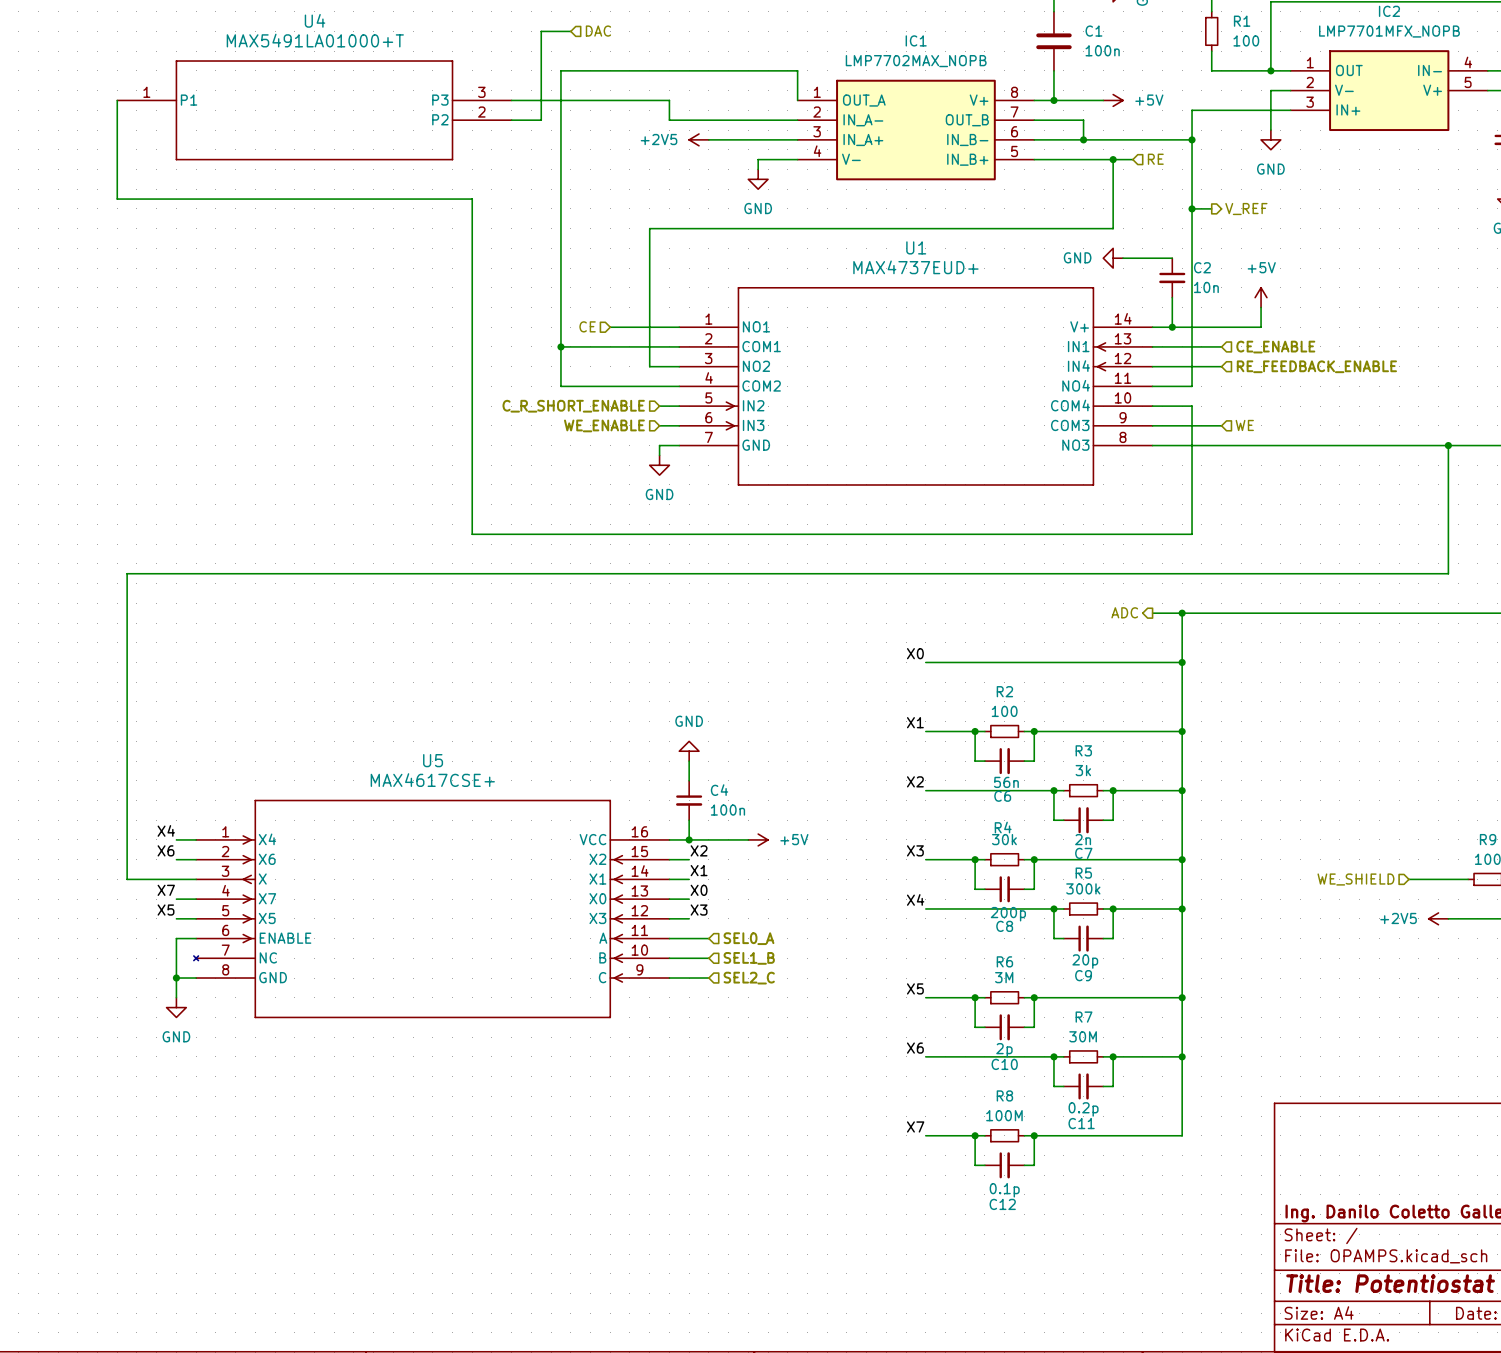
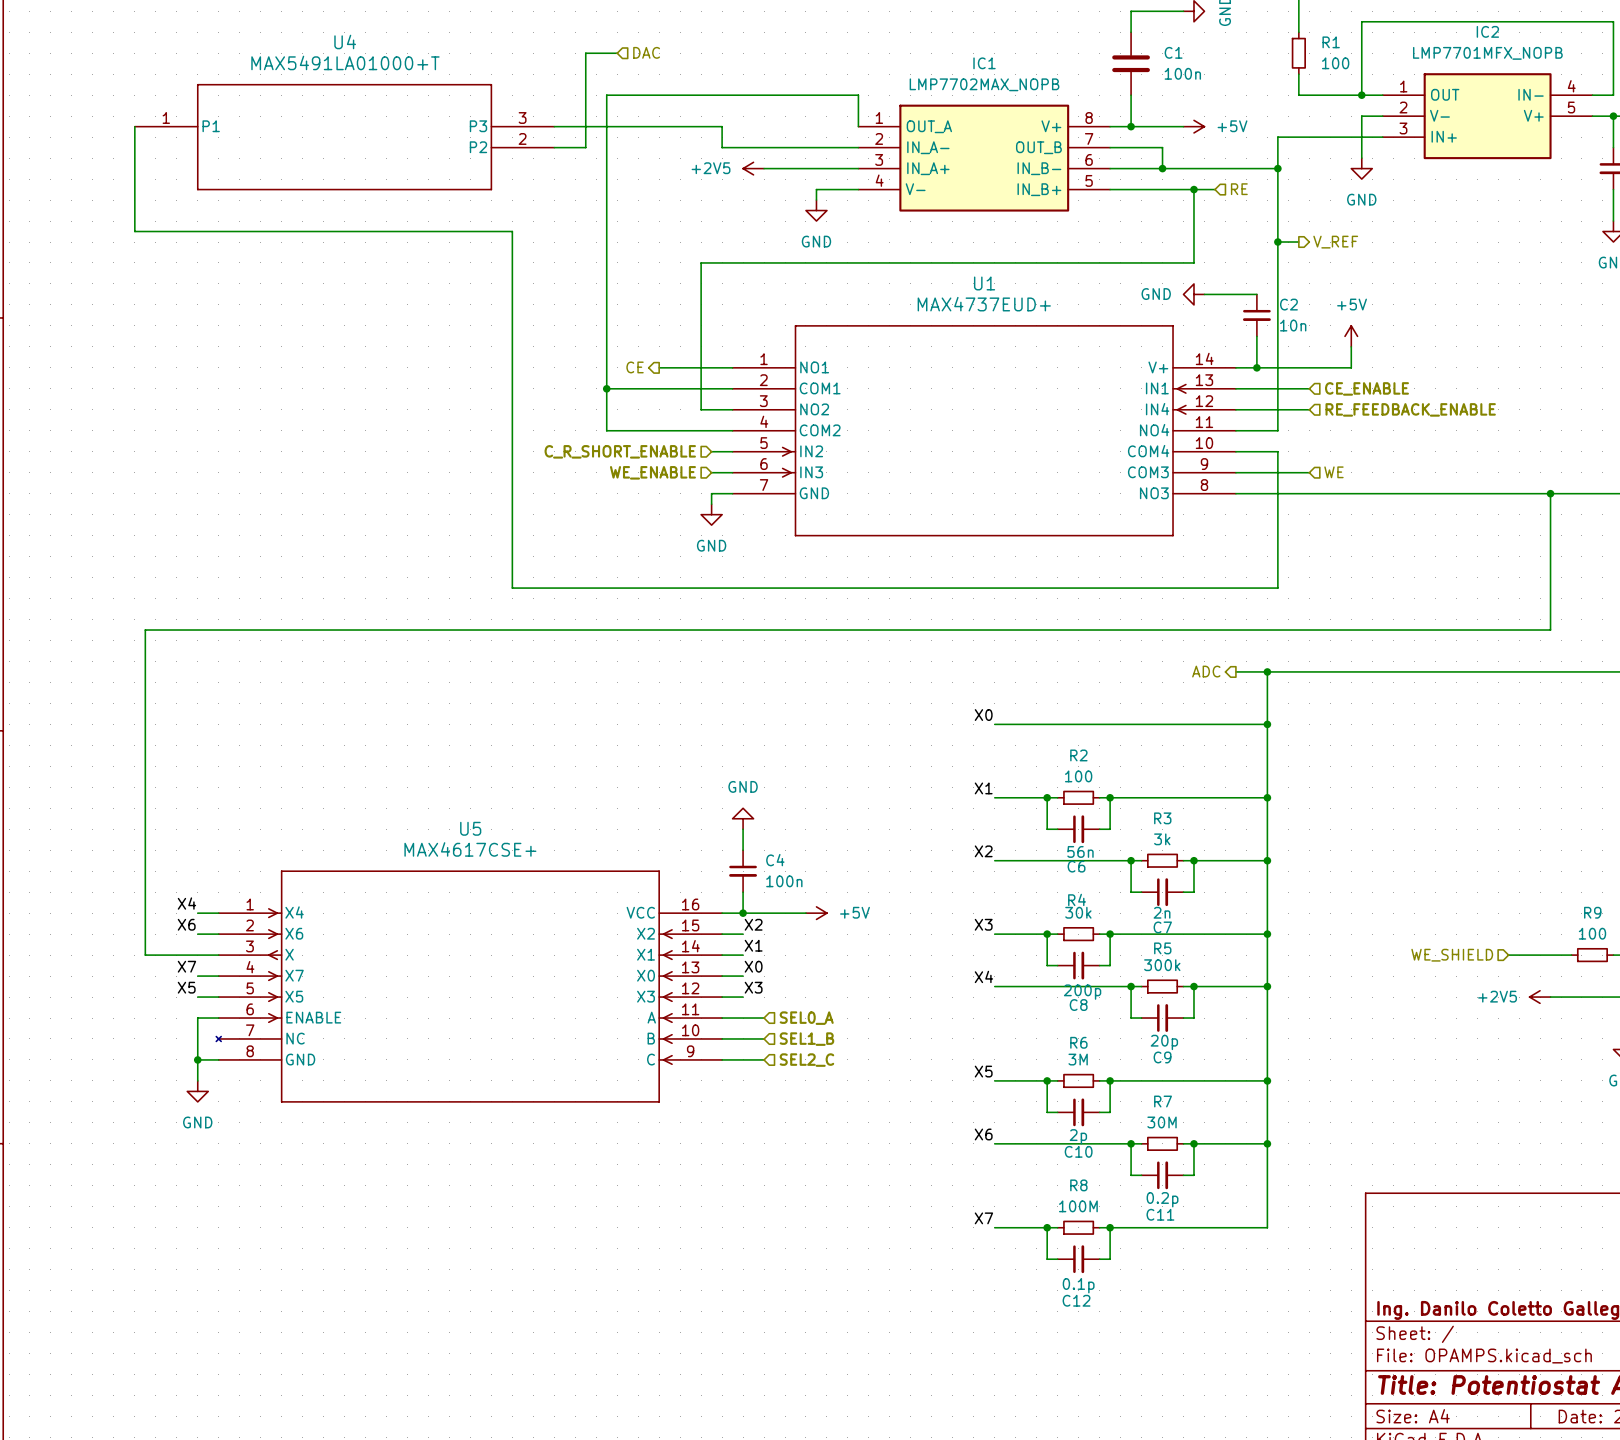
hierarchical label shape: input (587, 326) -> output (635, 367)

